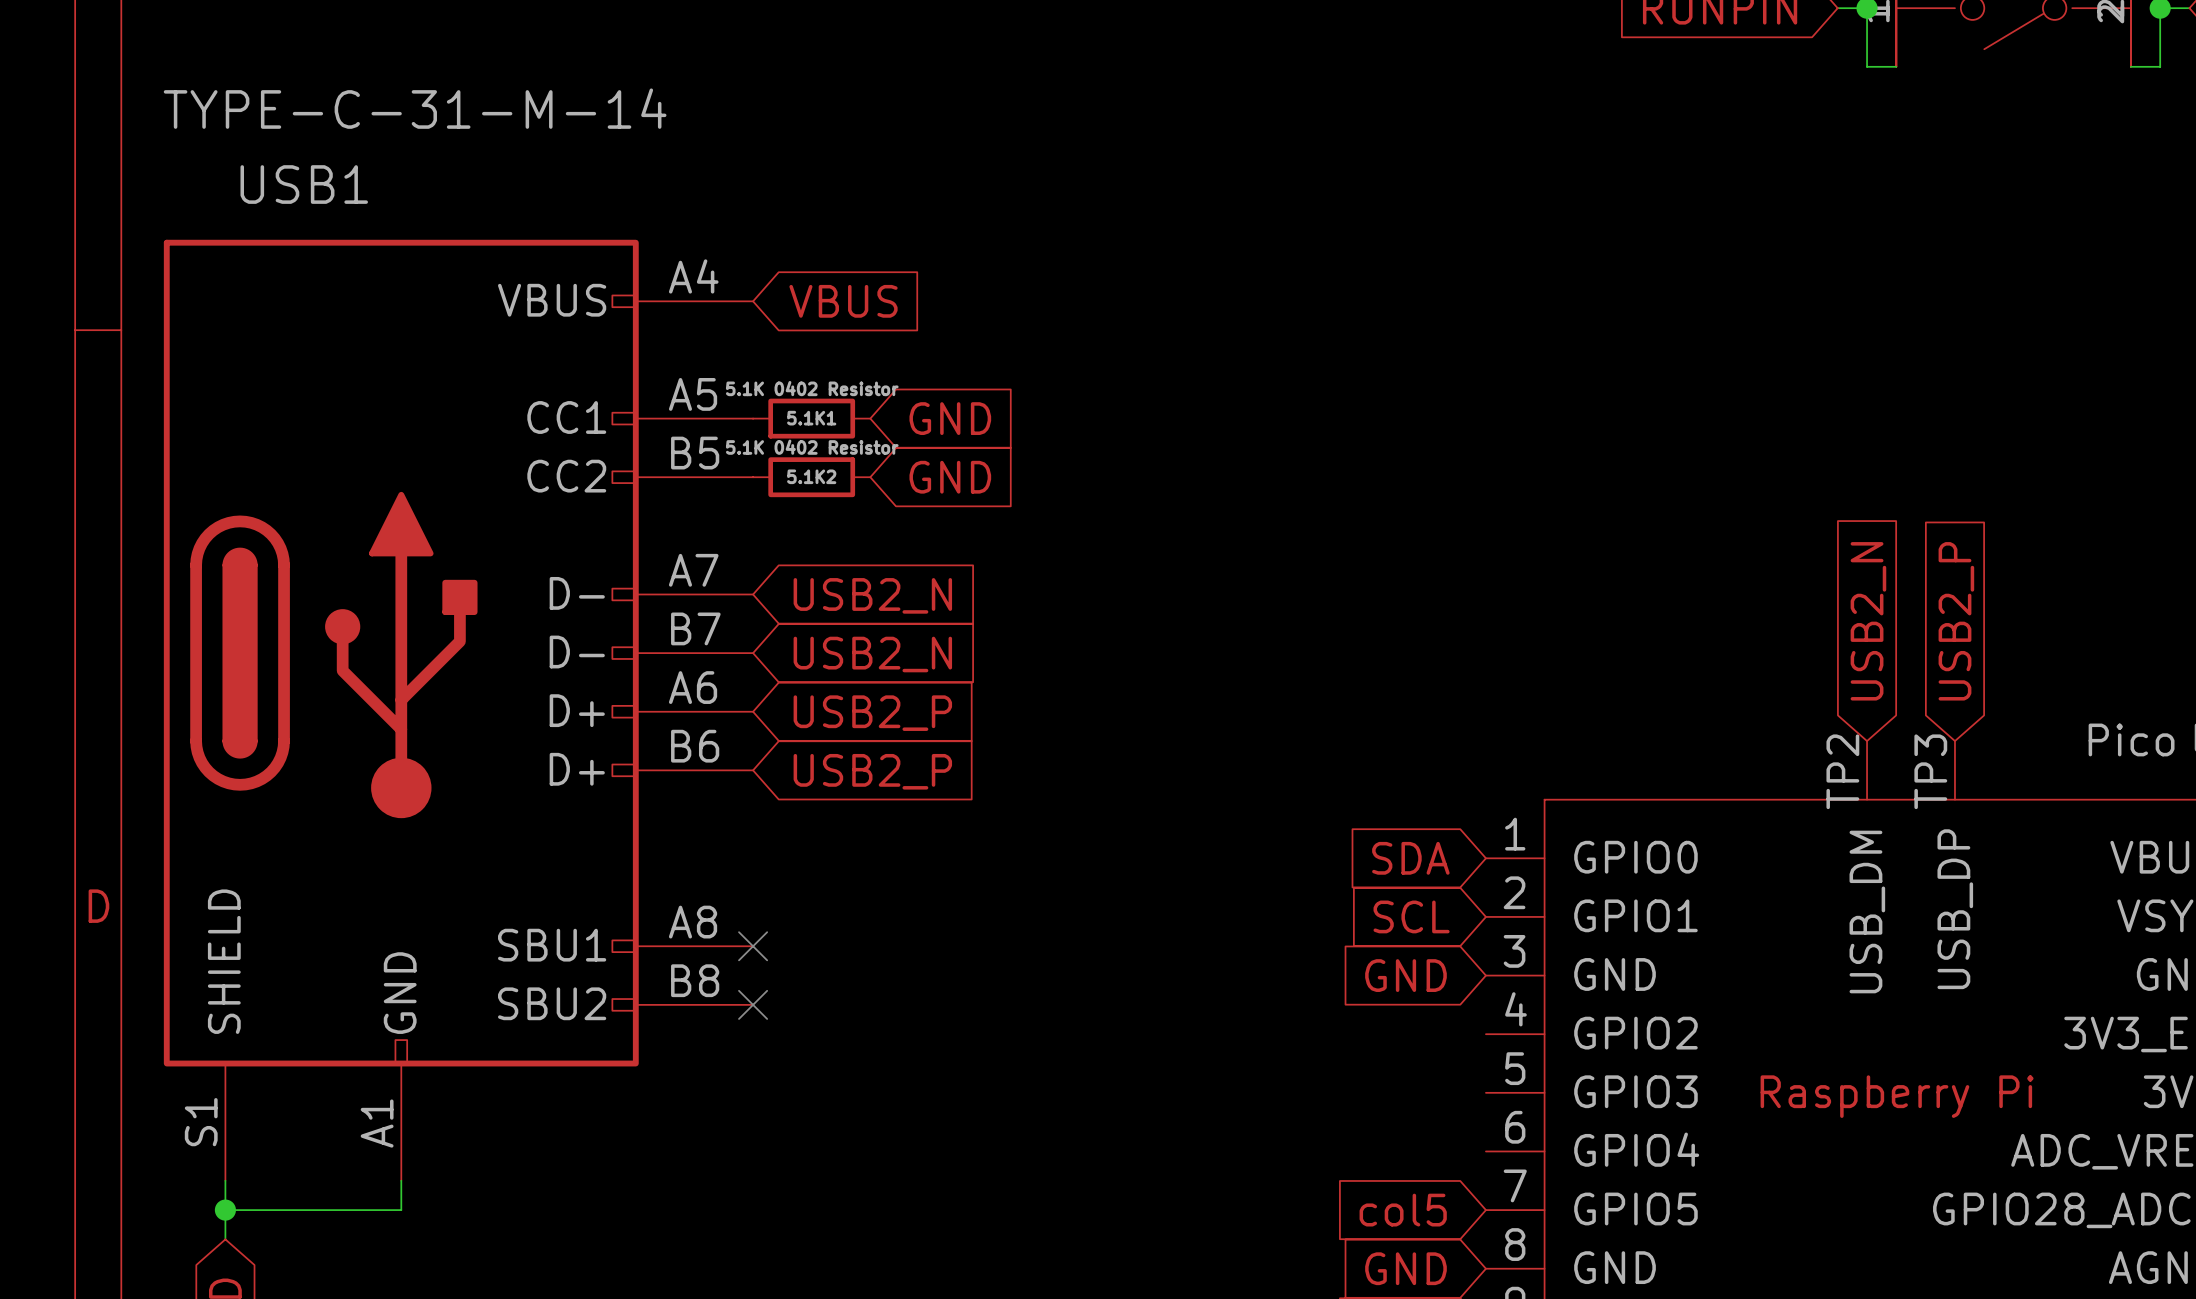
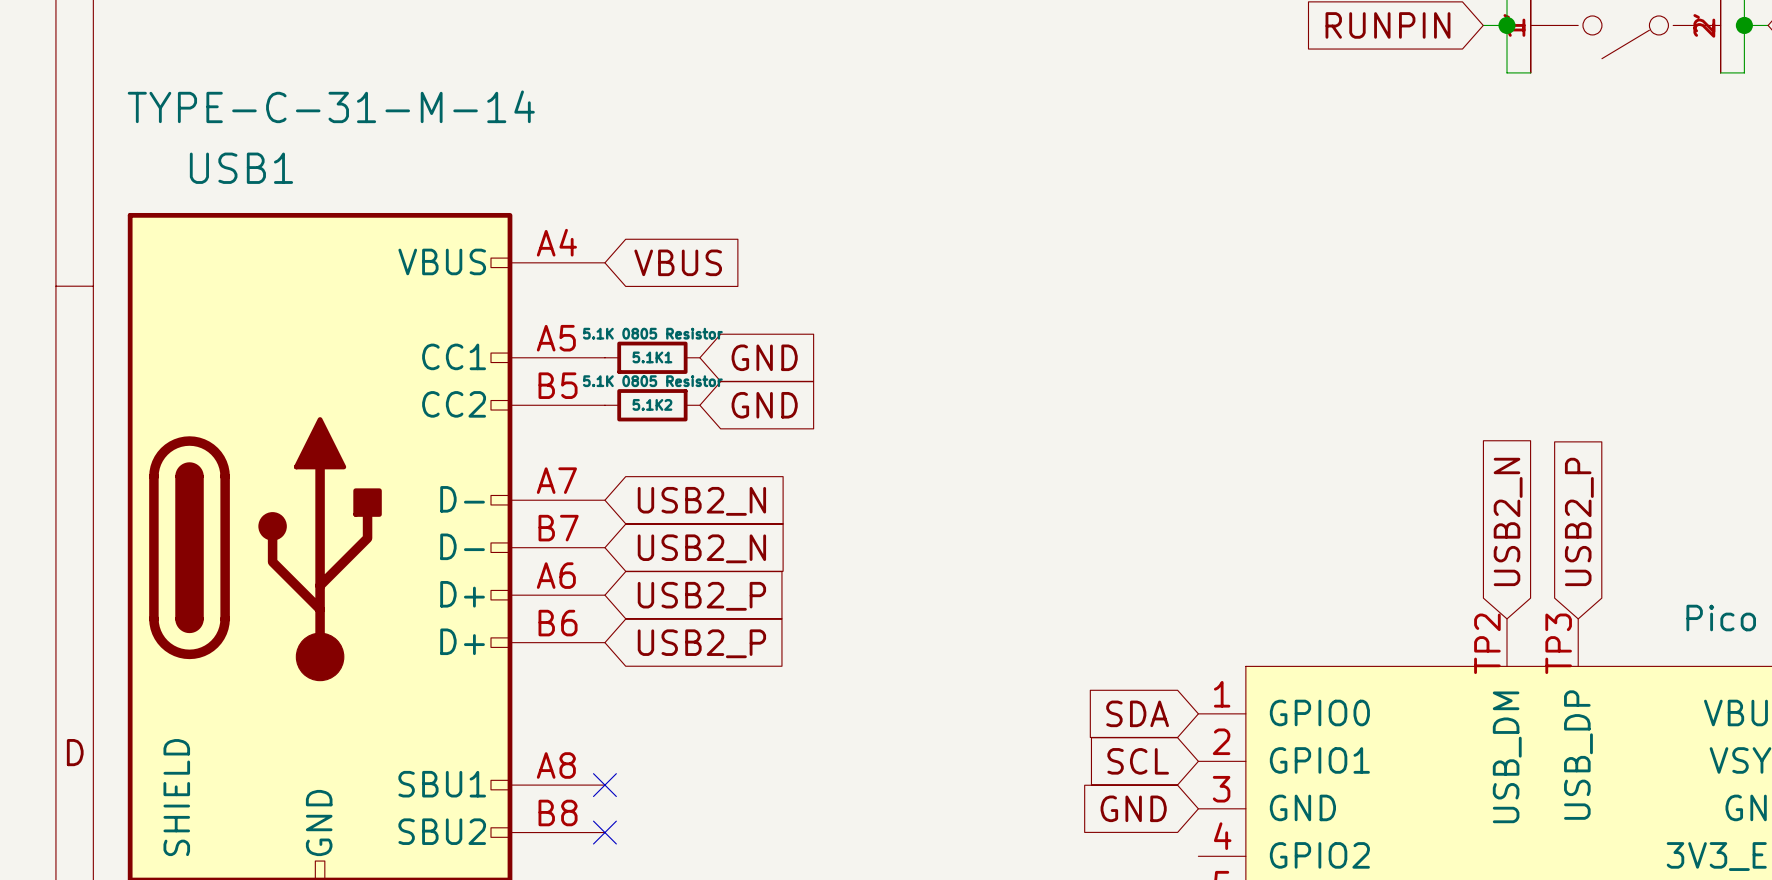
5.1K1 value: 5.1K 0402 Resistor (812, 388) -> 5.1K 0805 Resistor (652, 333)
5.1K2 value: 5.1K 0402 Resistor (812, 447) -> 5.1K 0805 Resistor (652, 381)

